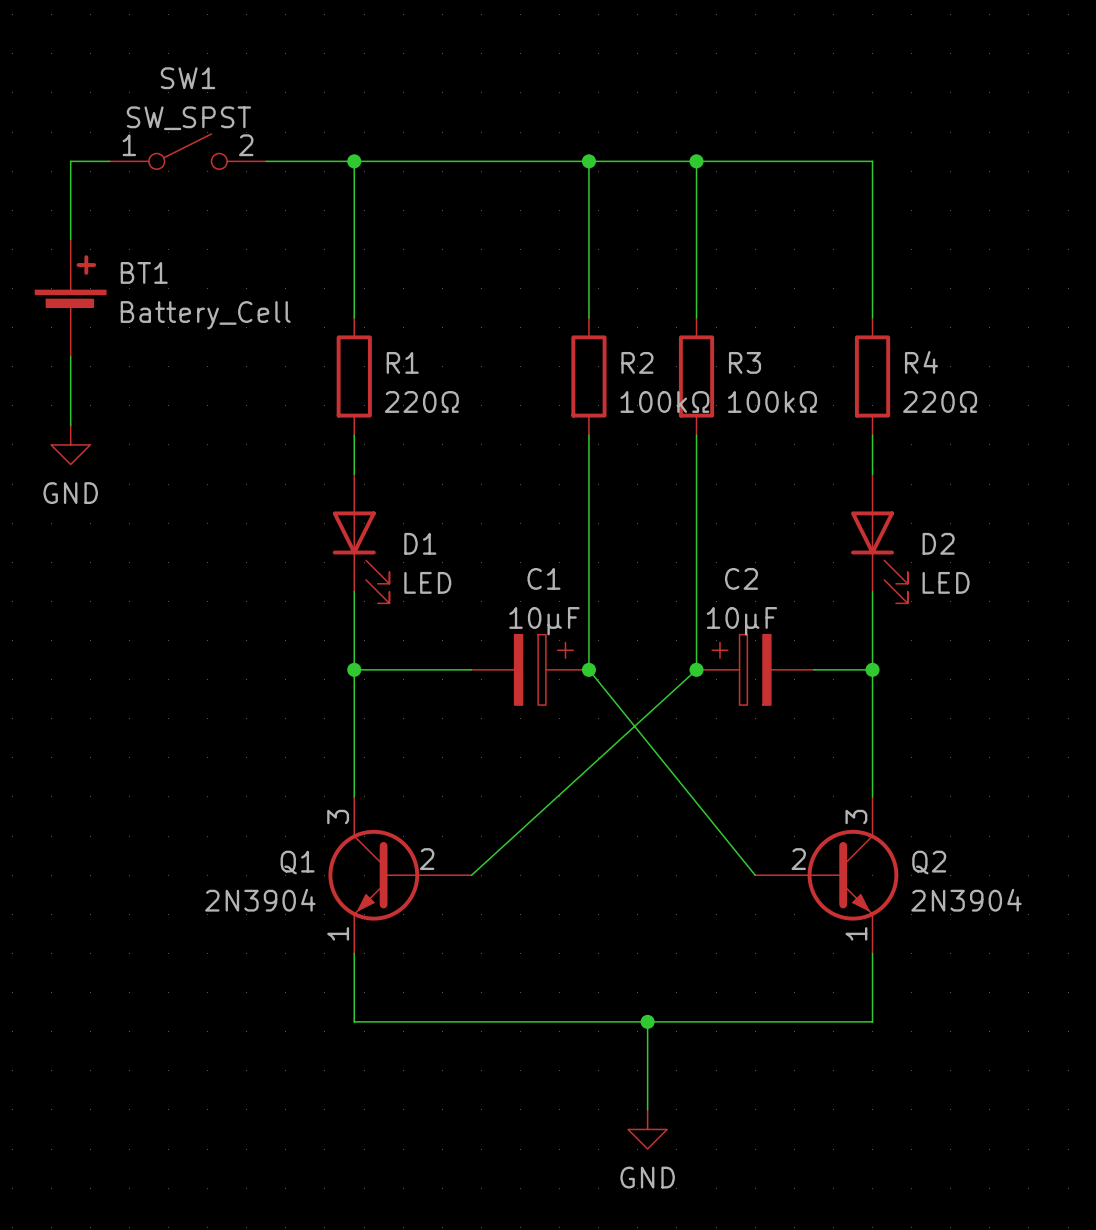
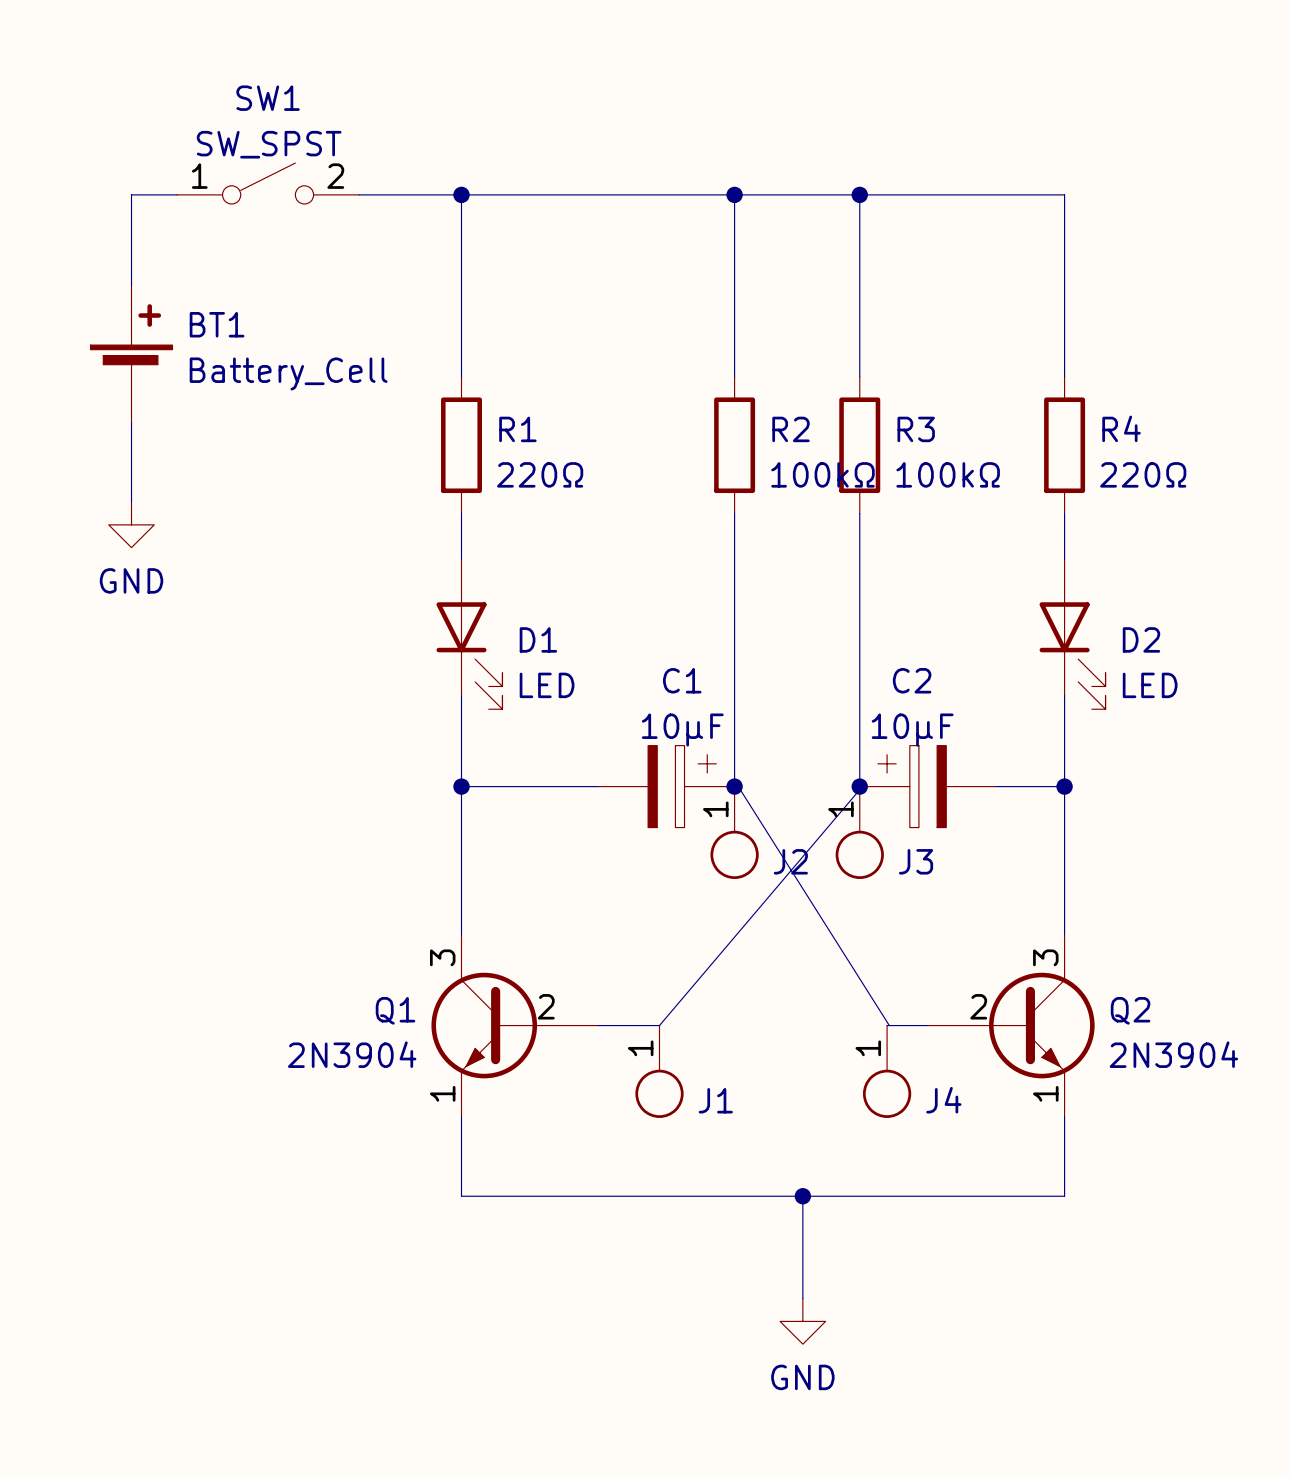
line: none -> (736, 784) (889, 1025)
line: none -> (864, 784) (659, 1025)
wire: (588, 669) (755, 875) -> (887, 1025) (928, 1025)
wire: (696, 669) (471, 875) -> (659, 1025) (598, 1025)
J2: none -> (734, 832)
J3: none -> (859, 832)
J1: none -> (659, 1071)
J4: none -> (887, 1071)

